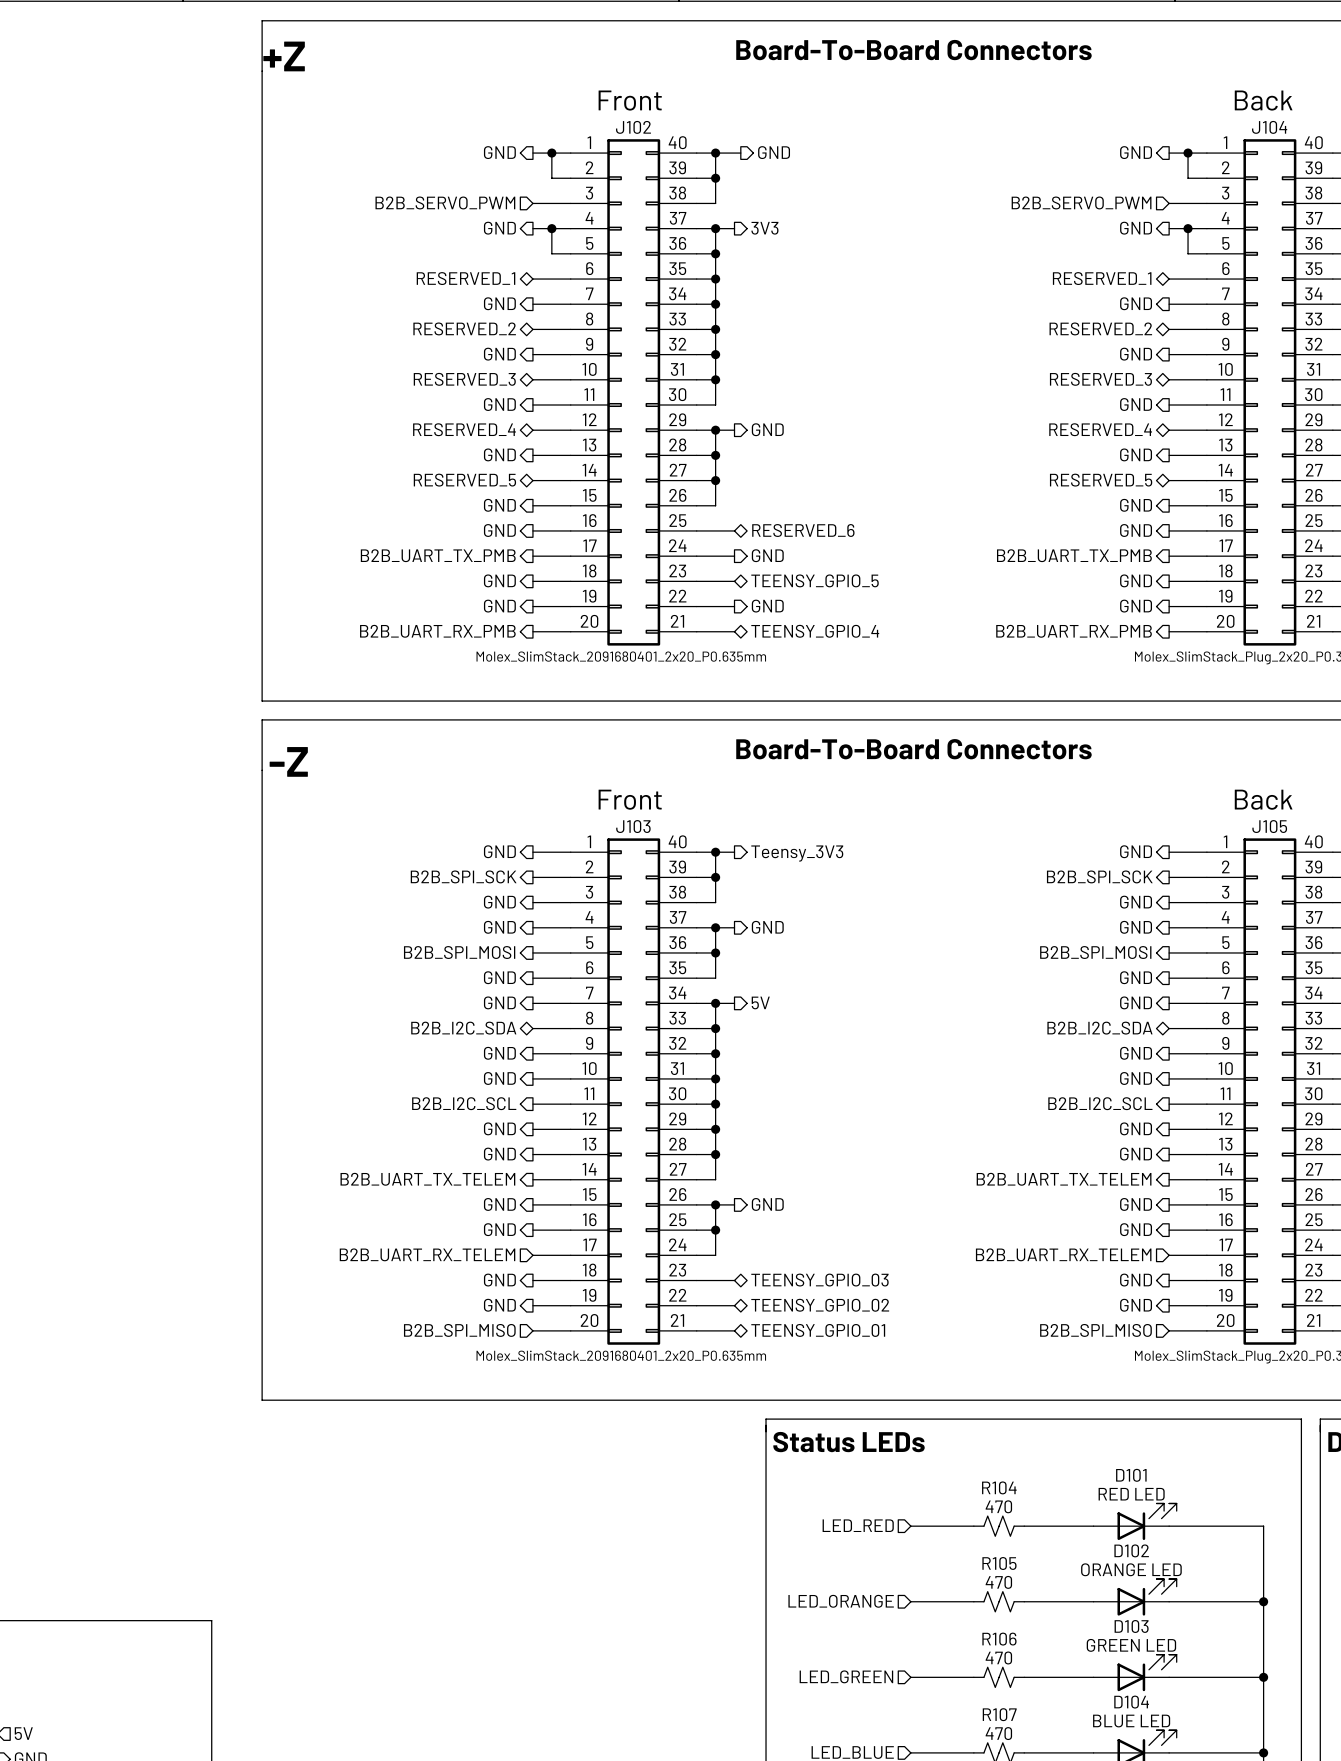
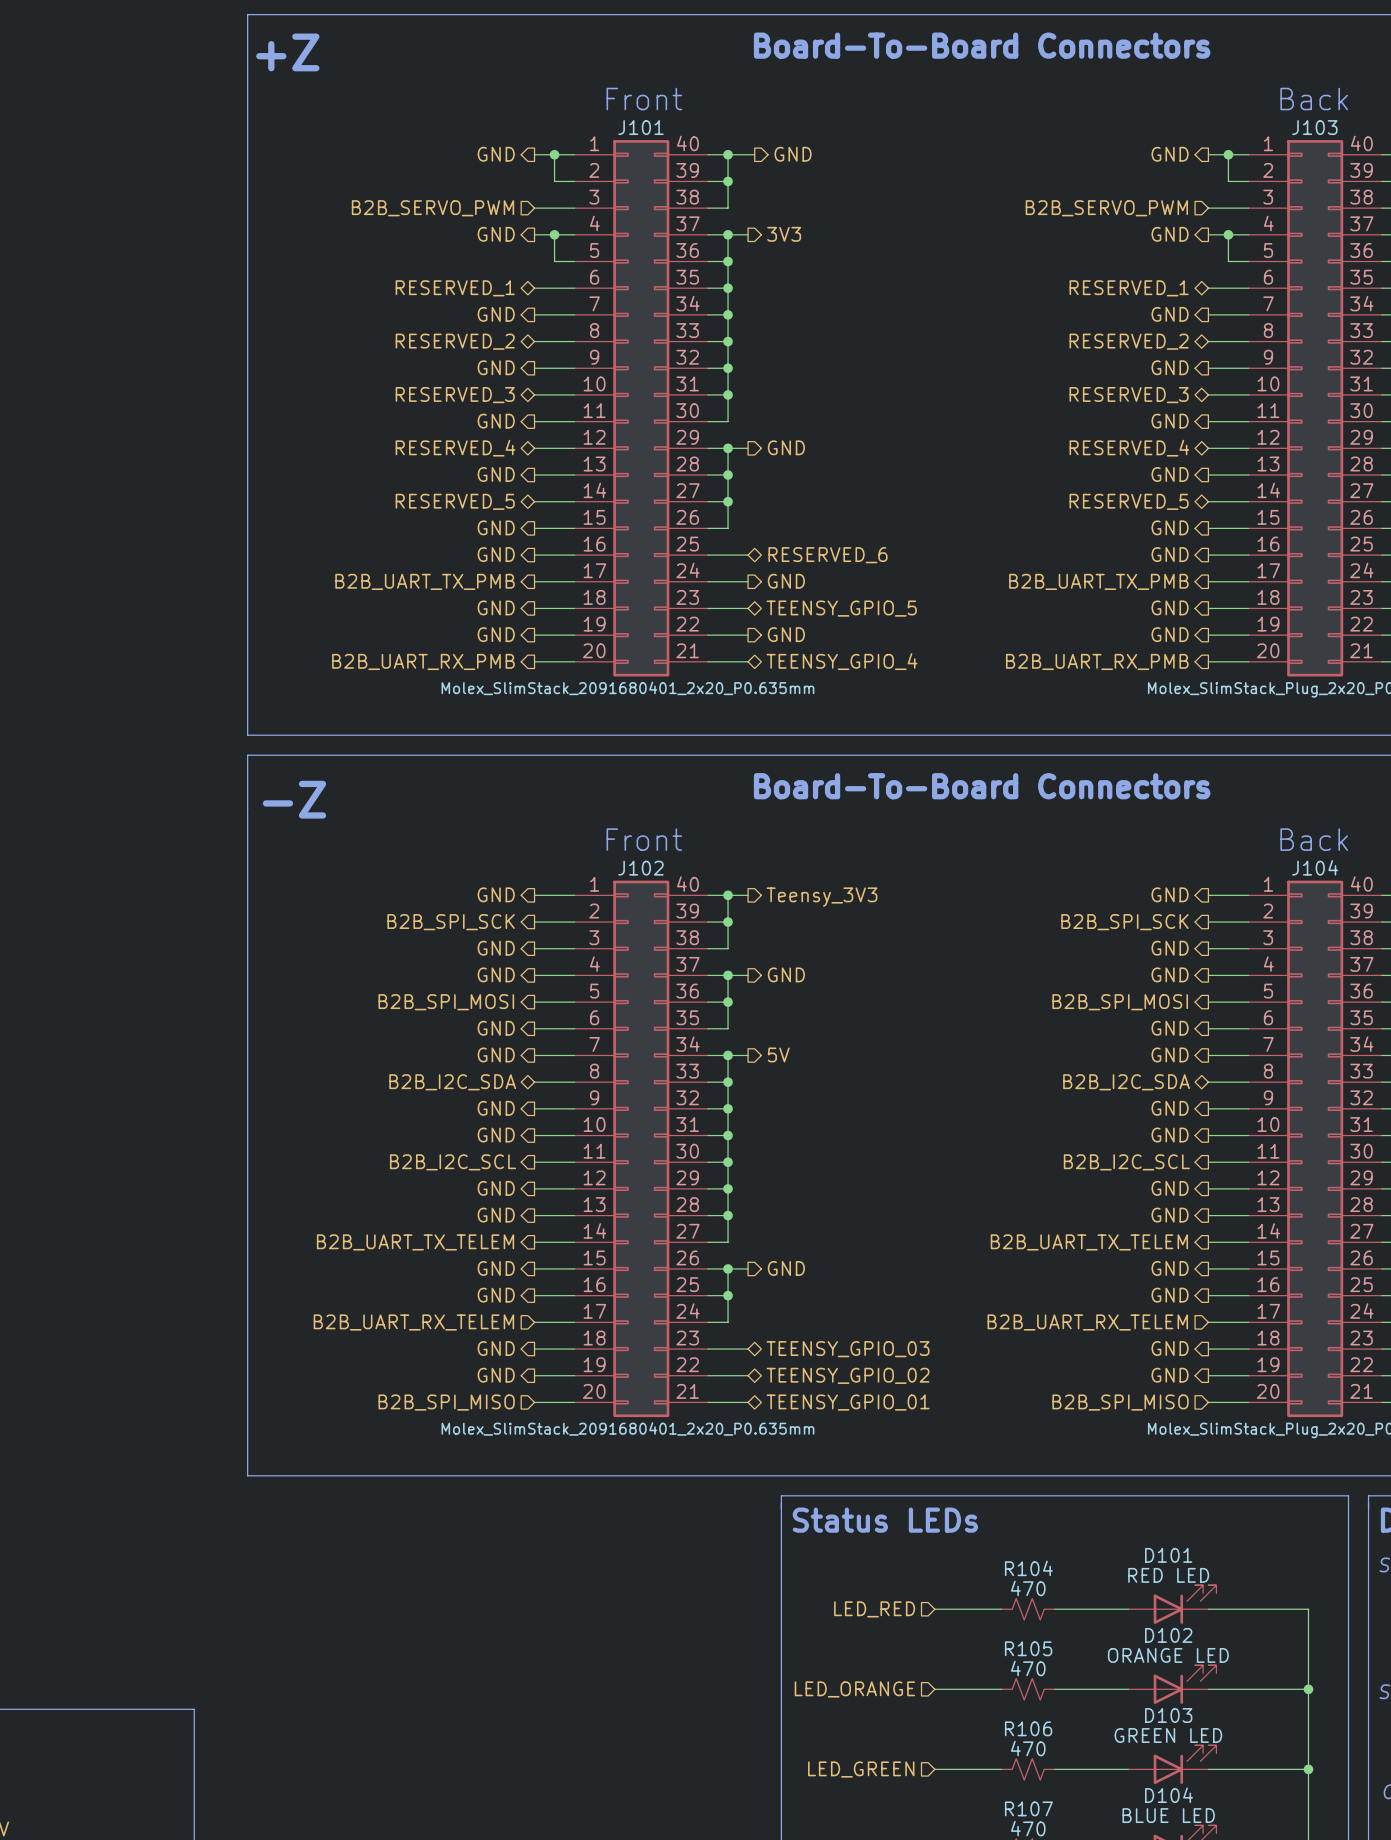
J102 name: J102 (633, 127) -> J101 (640, 127)
J104 name: J104 (1269, 127) -> J103 (1314, 127)
J103 name: J103 (633, 826) -> J102 (640, 868)
J105 name: J105 (1269, 826) -> J104 (1315, 867)

